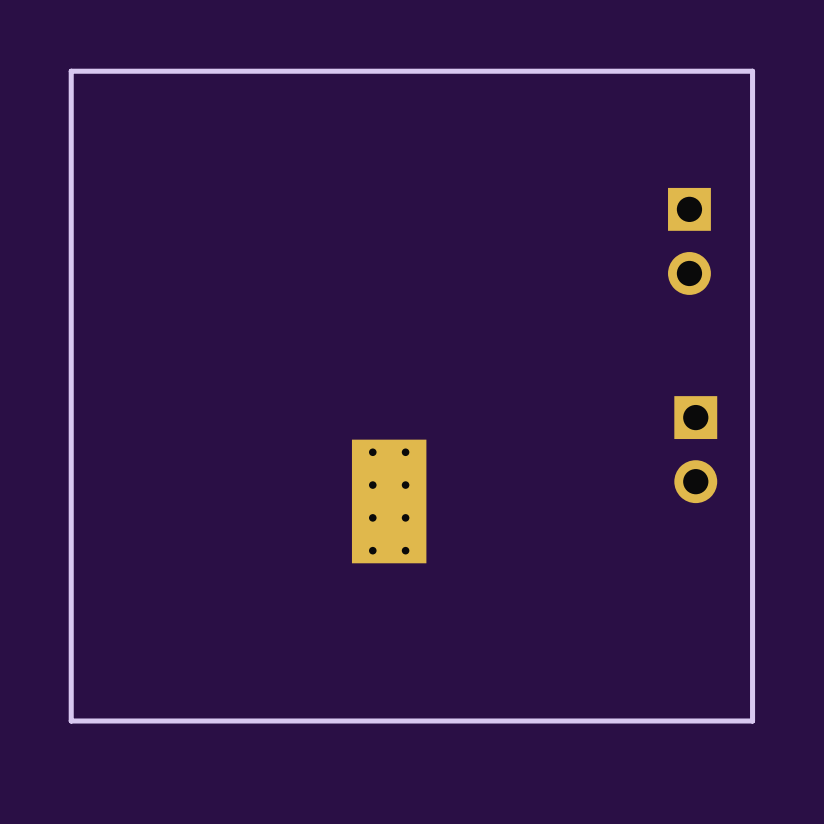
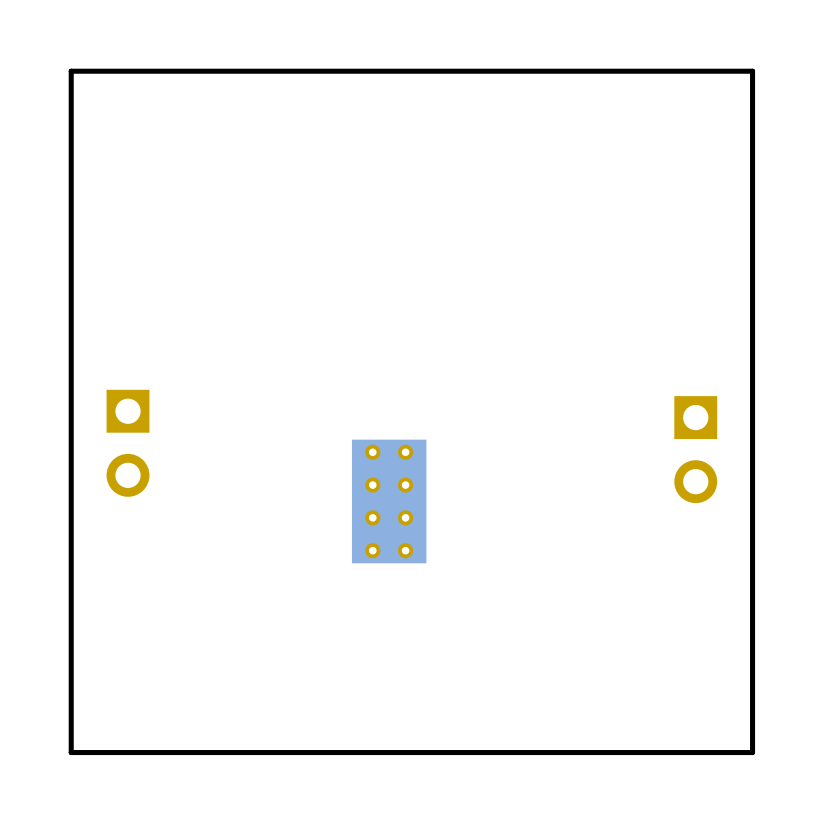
part position: (689, 241) -> (128, 443)
board edge: (752, 721) (71, 721) -> (752, 721) (752, 752) (71, 752) (71, 721)

